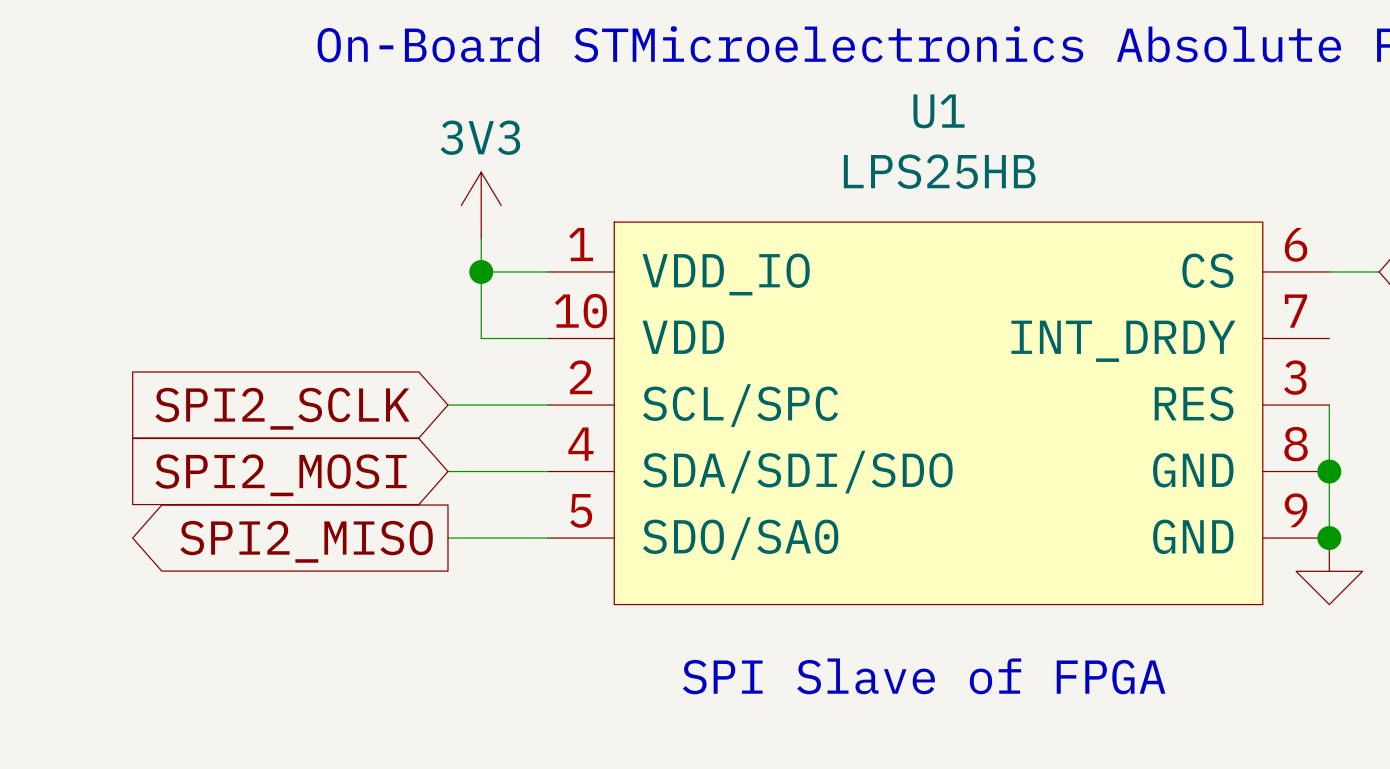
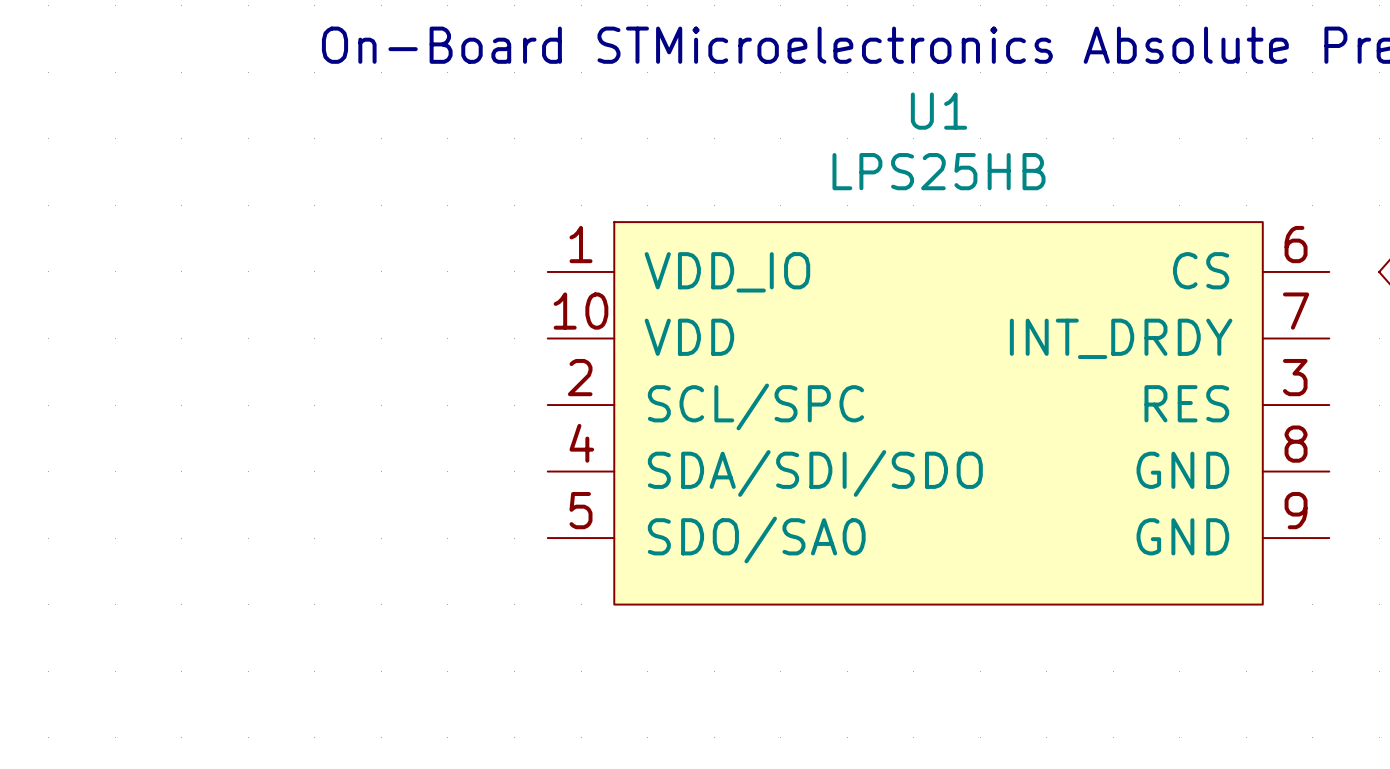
power symbol: 3V3 (481, 205) -> none
wire: (481, 238) (481, 338) (547, 338) -> none
wire: (481, 271) (547, 271) -> none
junction: (481, 271) -> none
wire: (1329, 271) (1379, 271) -> none
wire: (447, 405) (547, 405) -> none
wire: (1329, 405) (1329, 538) -> none
global label: SPI2_SCLK (282, 408) -> none
wire: (447, 471) (547, 471) -> none
junction: (1329, 471) -> none
global label: SPI2_MOSI (280, 475) -> none
wire: (447, 538) (547, 538) -> none
junction: (1329, 538) -> none
global label: SPI2_MISO (306, 541) -> none
power symbol: (1329, 571) -> none
text: SPI Slave of FPGA (924, 676) -> none

